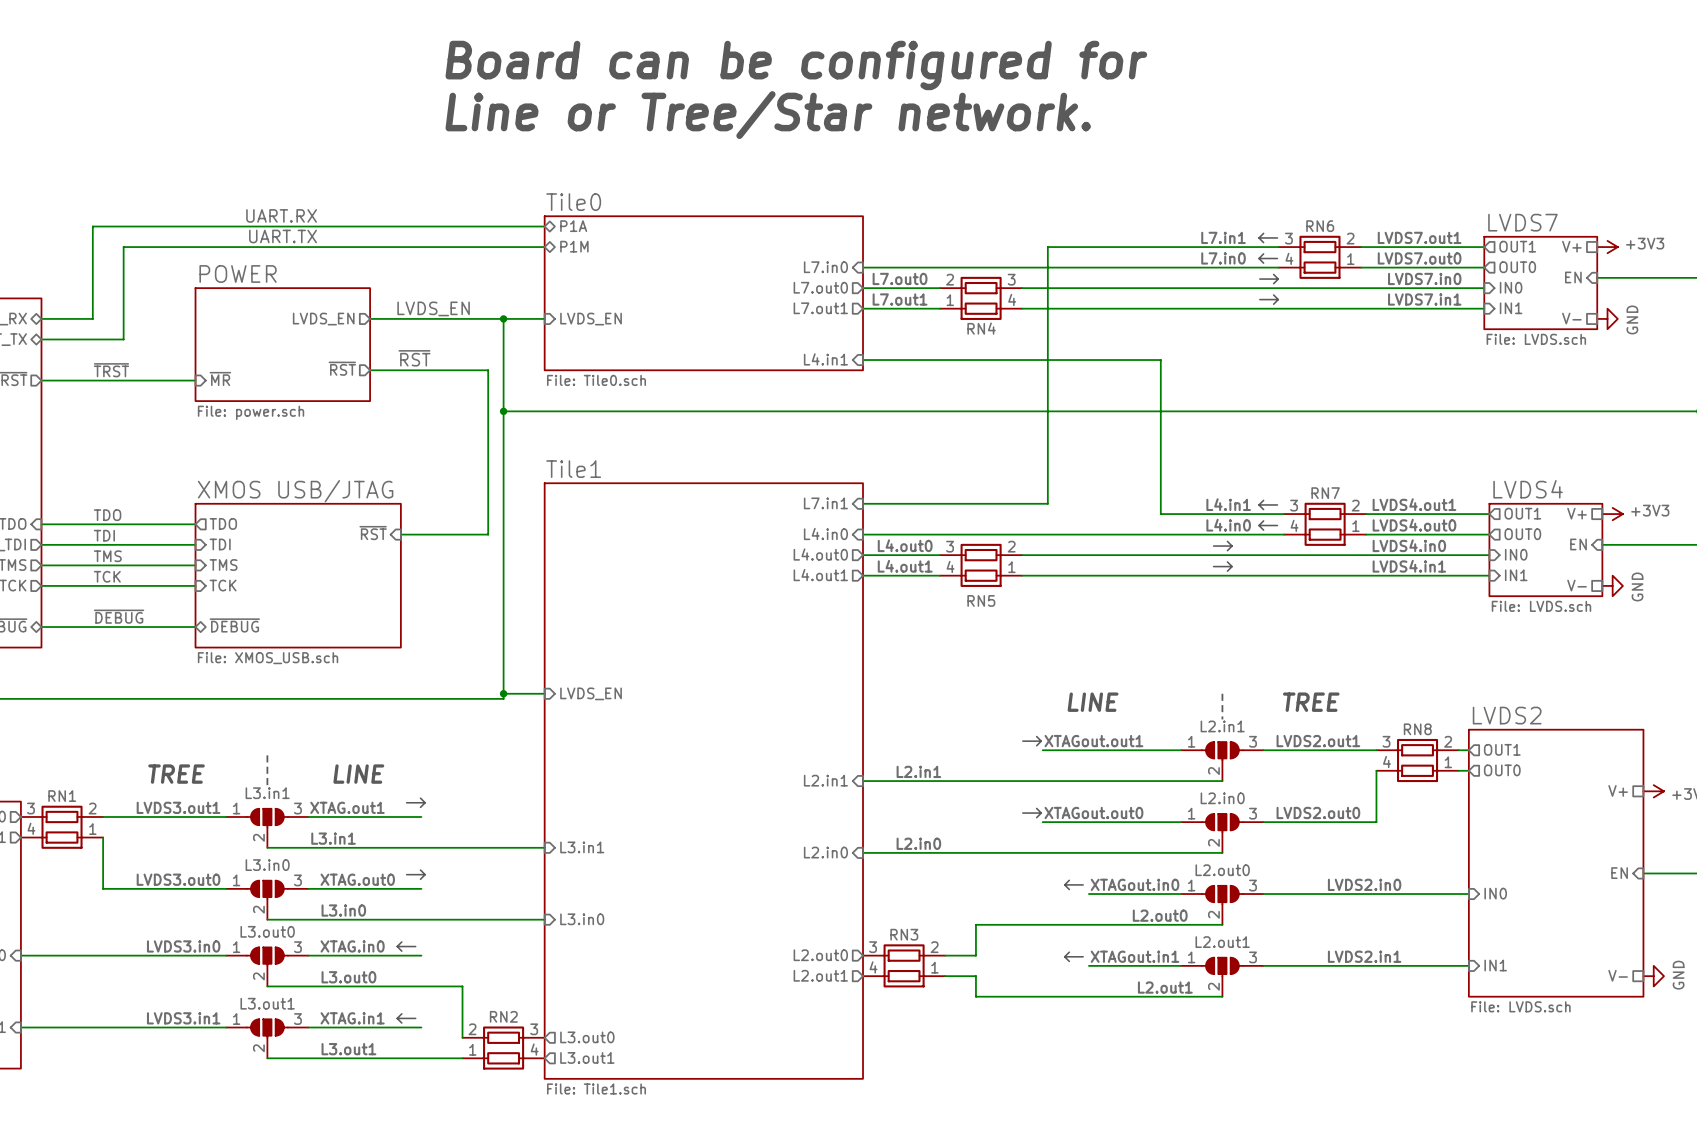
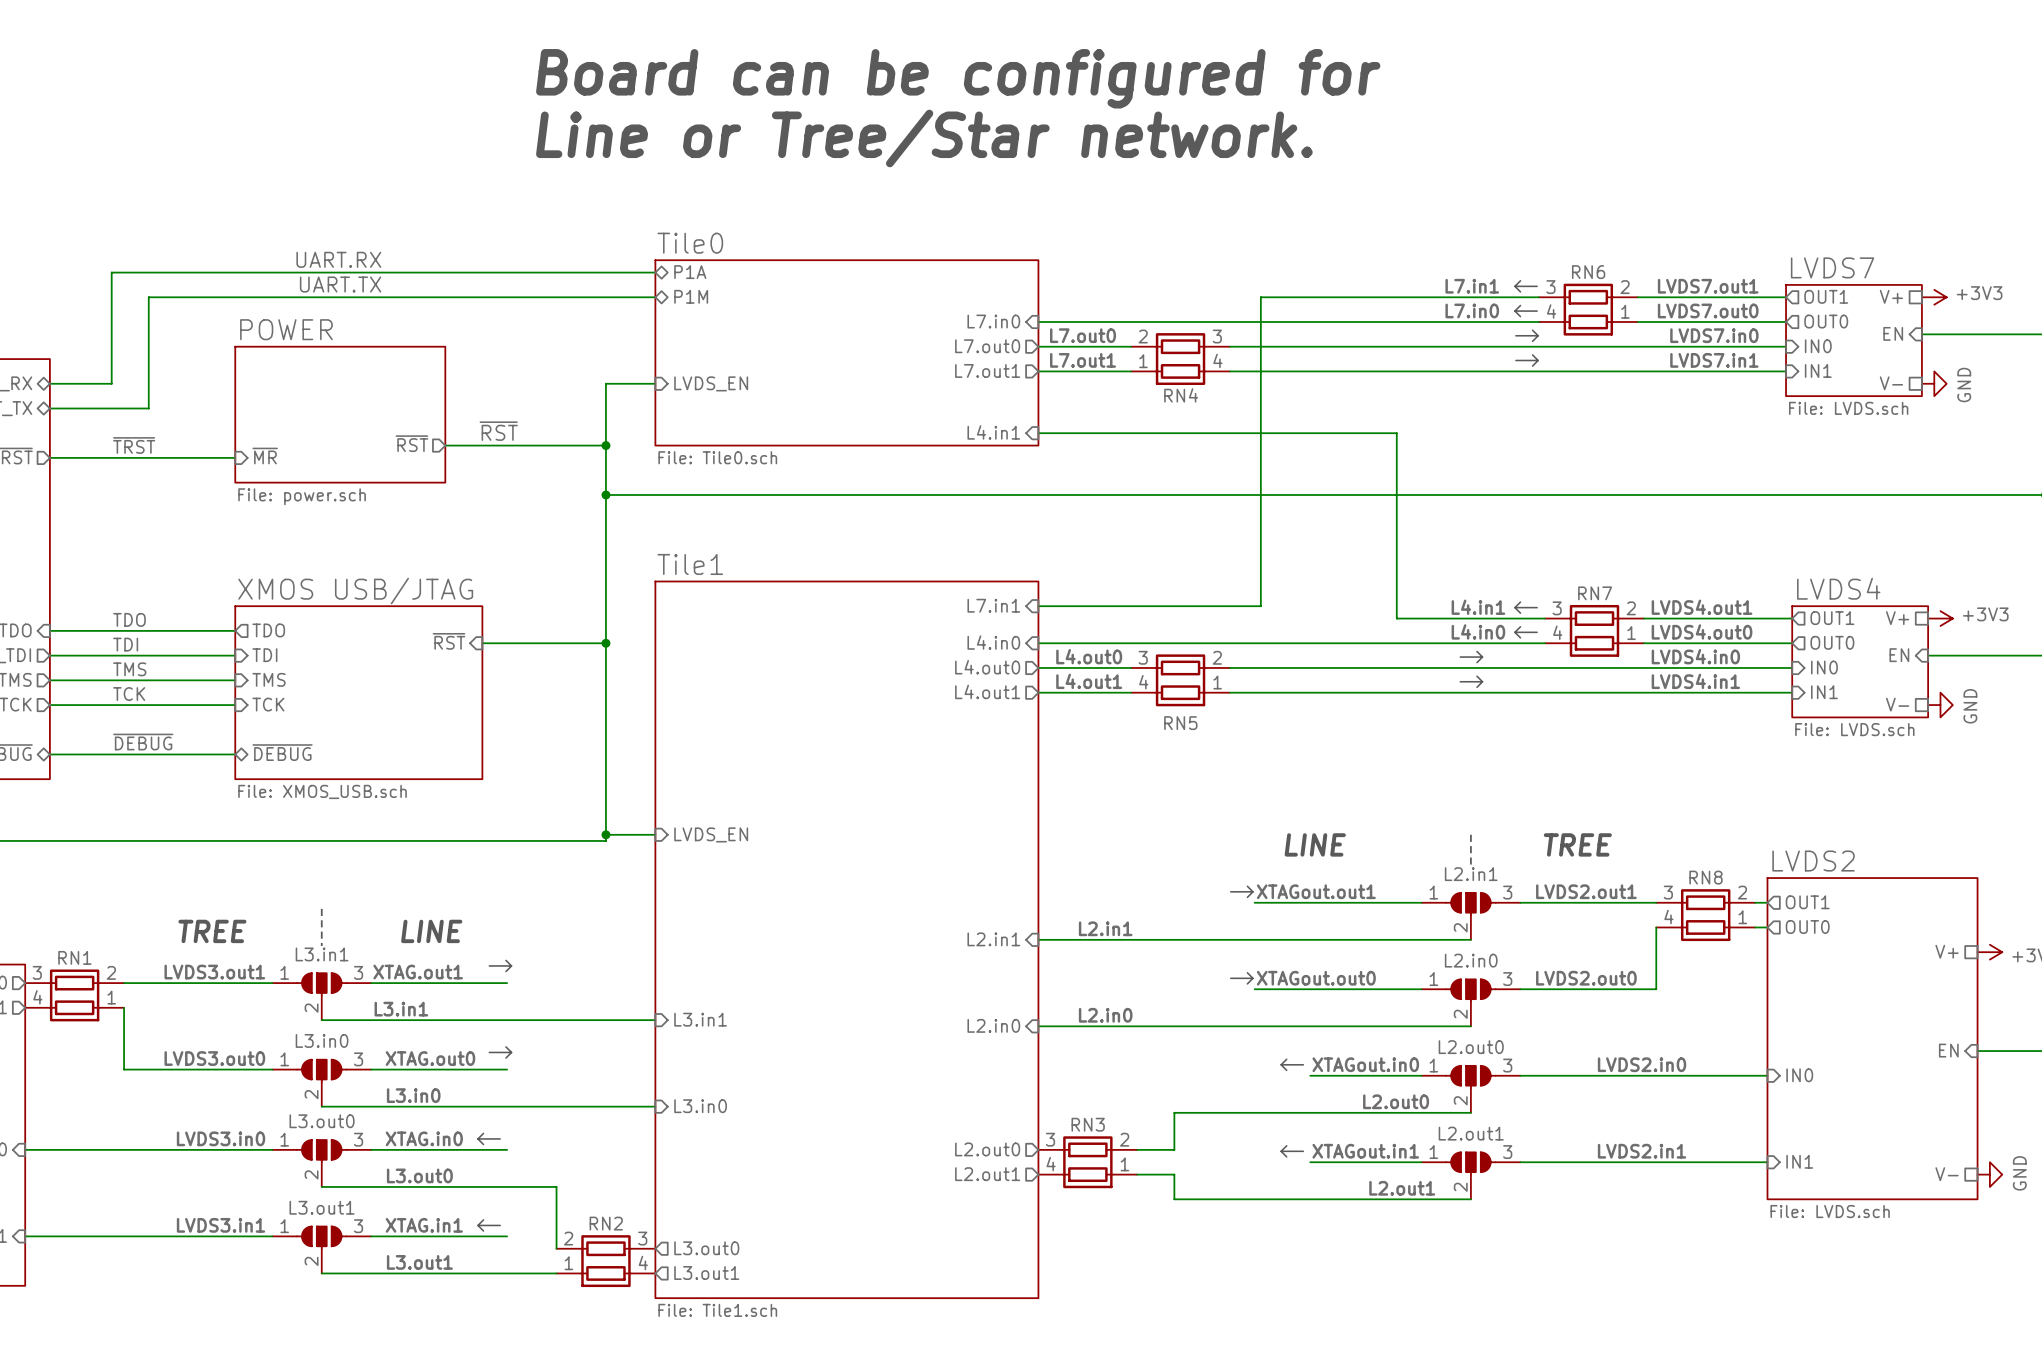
label: LVDS_EN (433, 308) -> none
wire: (370, 318) (503, 318) -> none
junction: (503, 318) -> none
sheet pin: LVDS_EN (323, 319) -> none
wire: (488, 370) (488, 534) -> (587, 445) (605, 445)
junction: none -> (605, 445)
wire: none -> (587, 643) (605, 643)
junction: none -> (605, 643)

